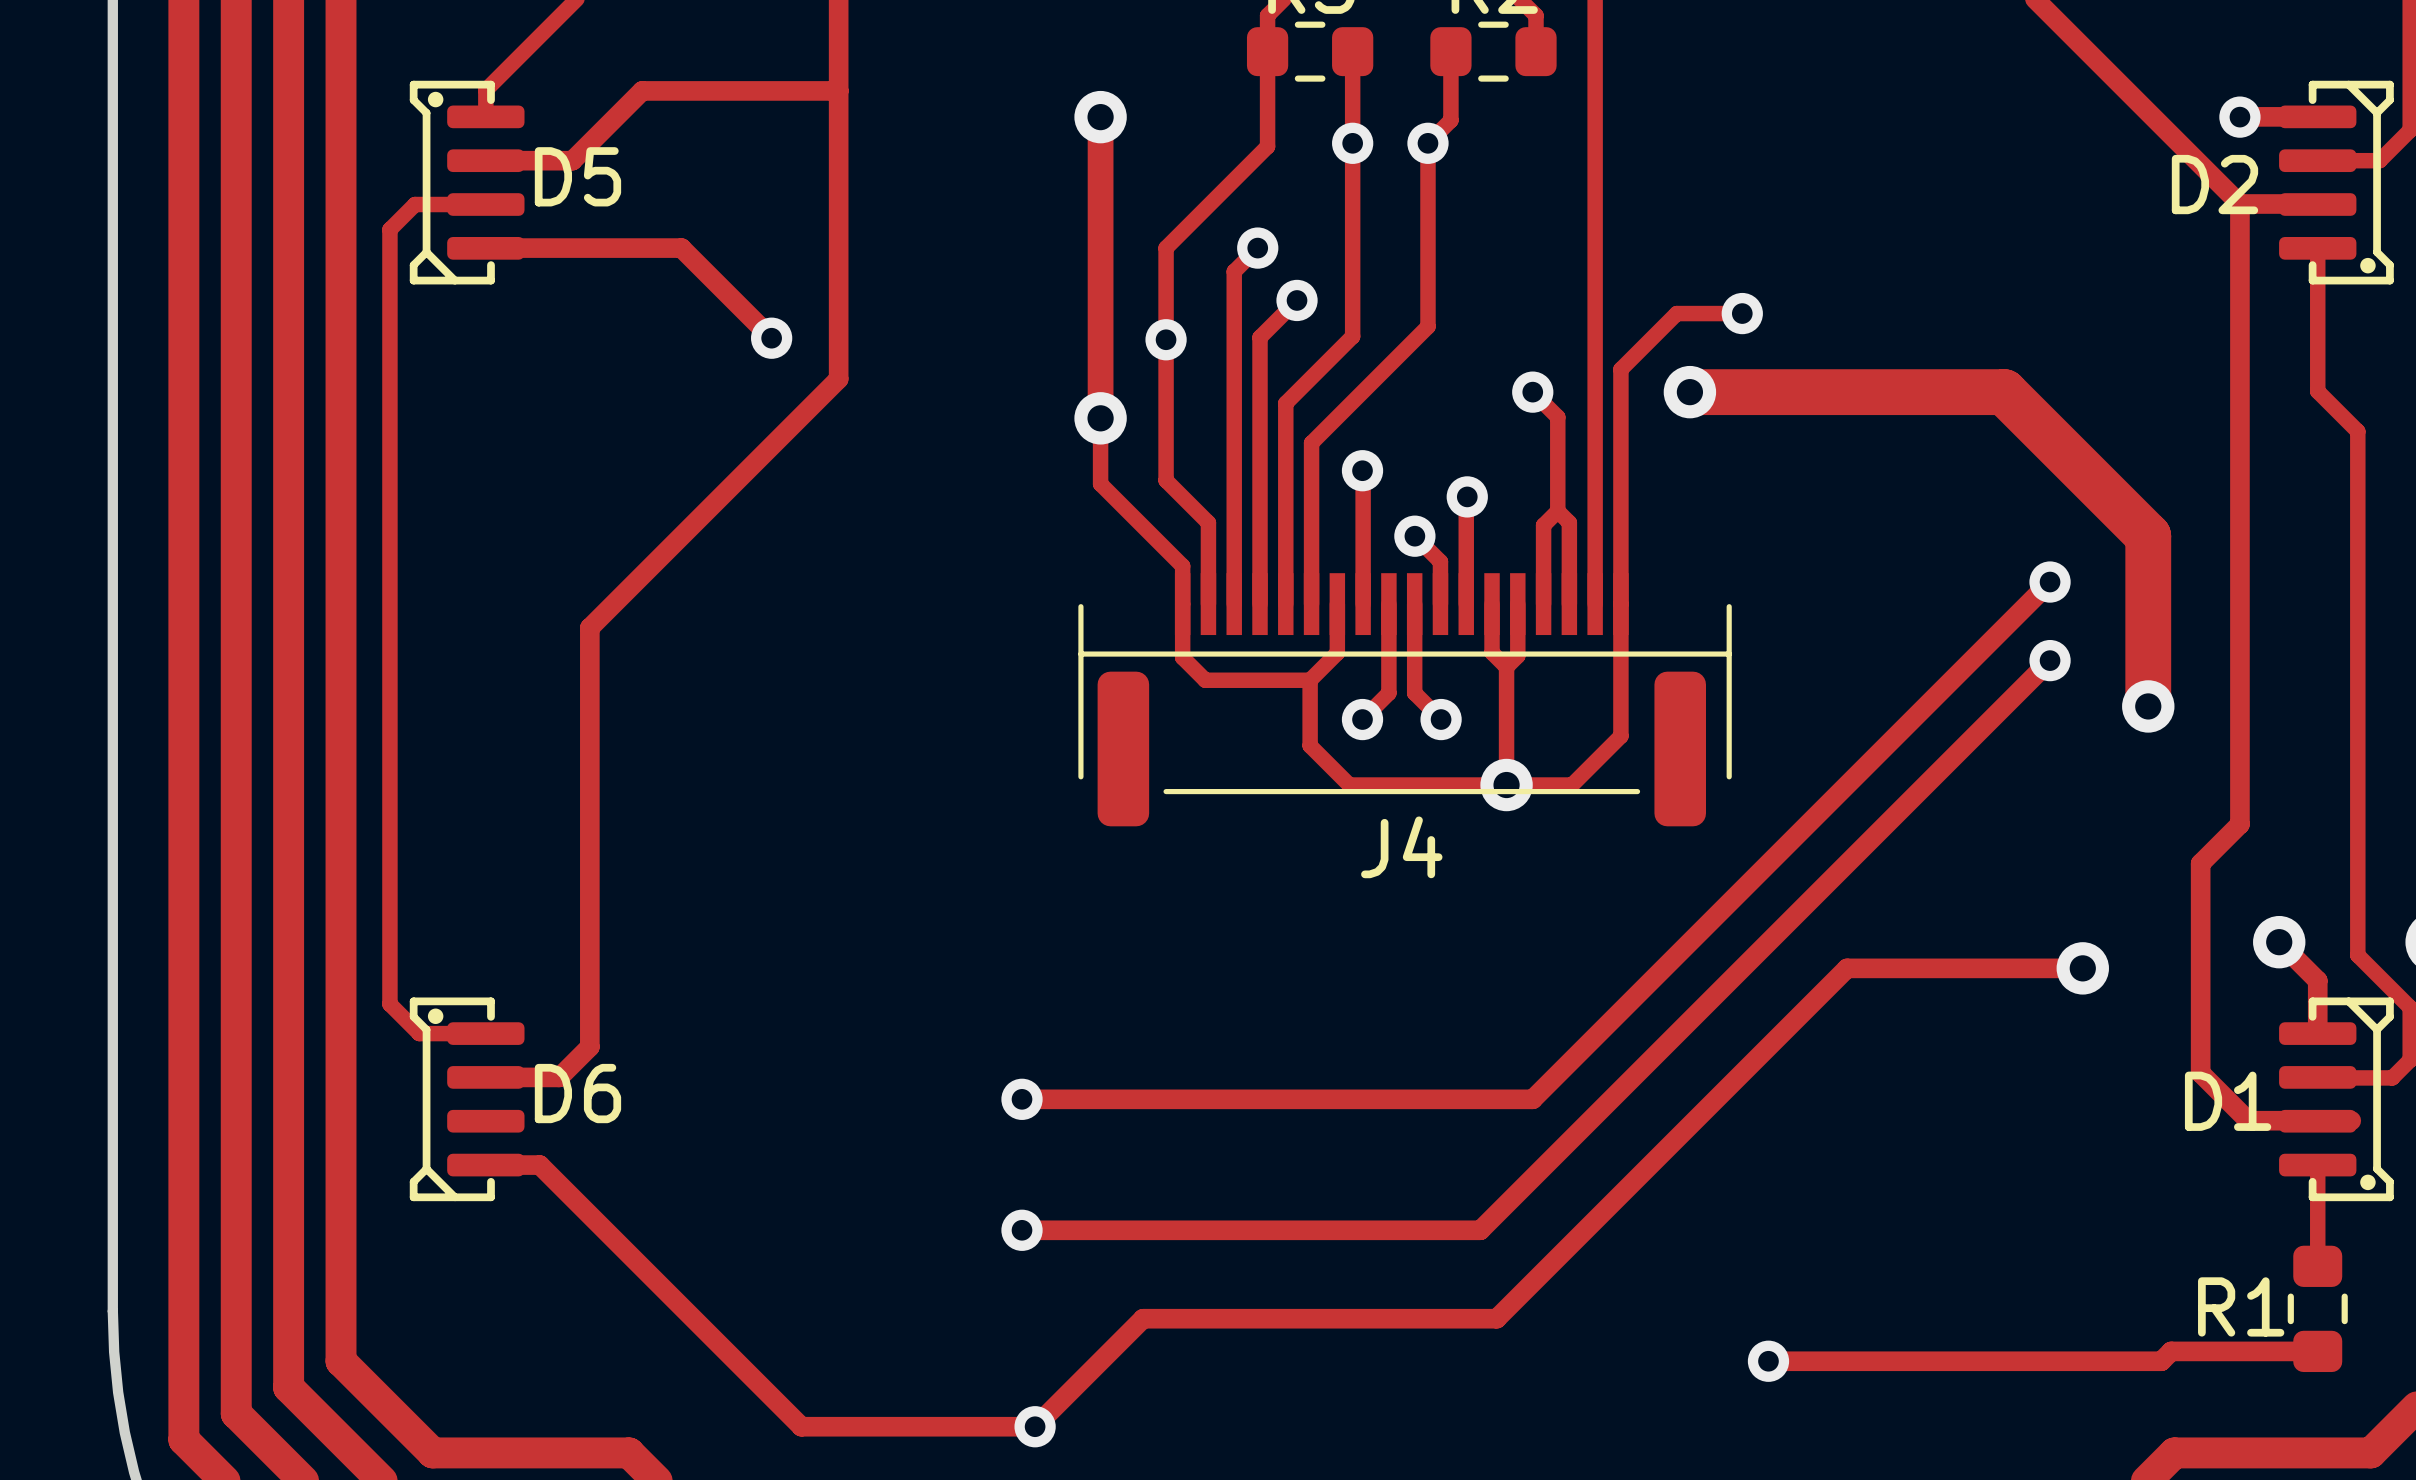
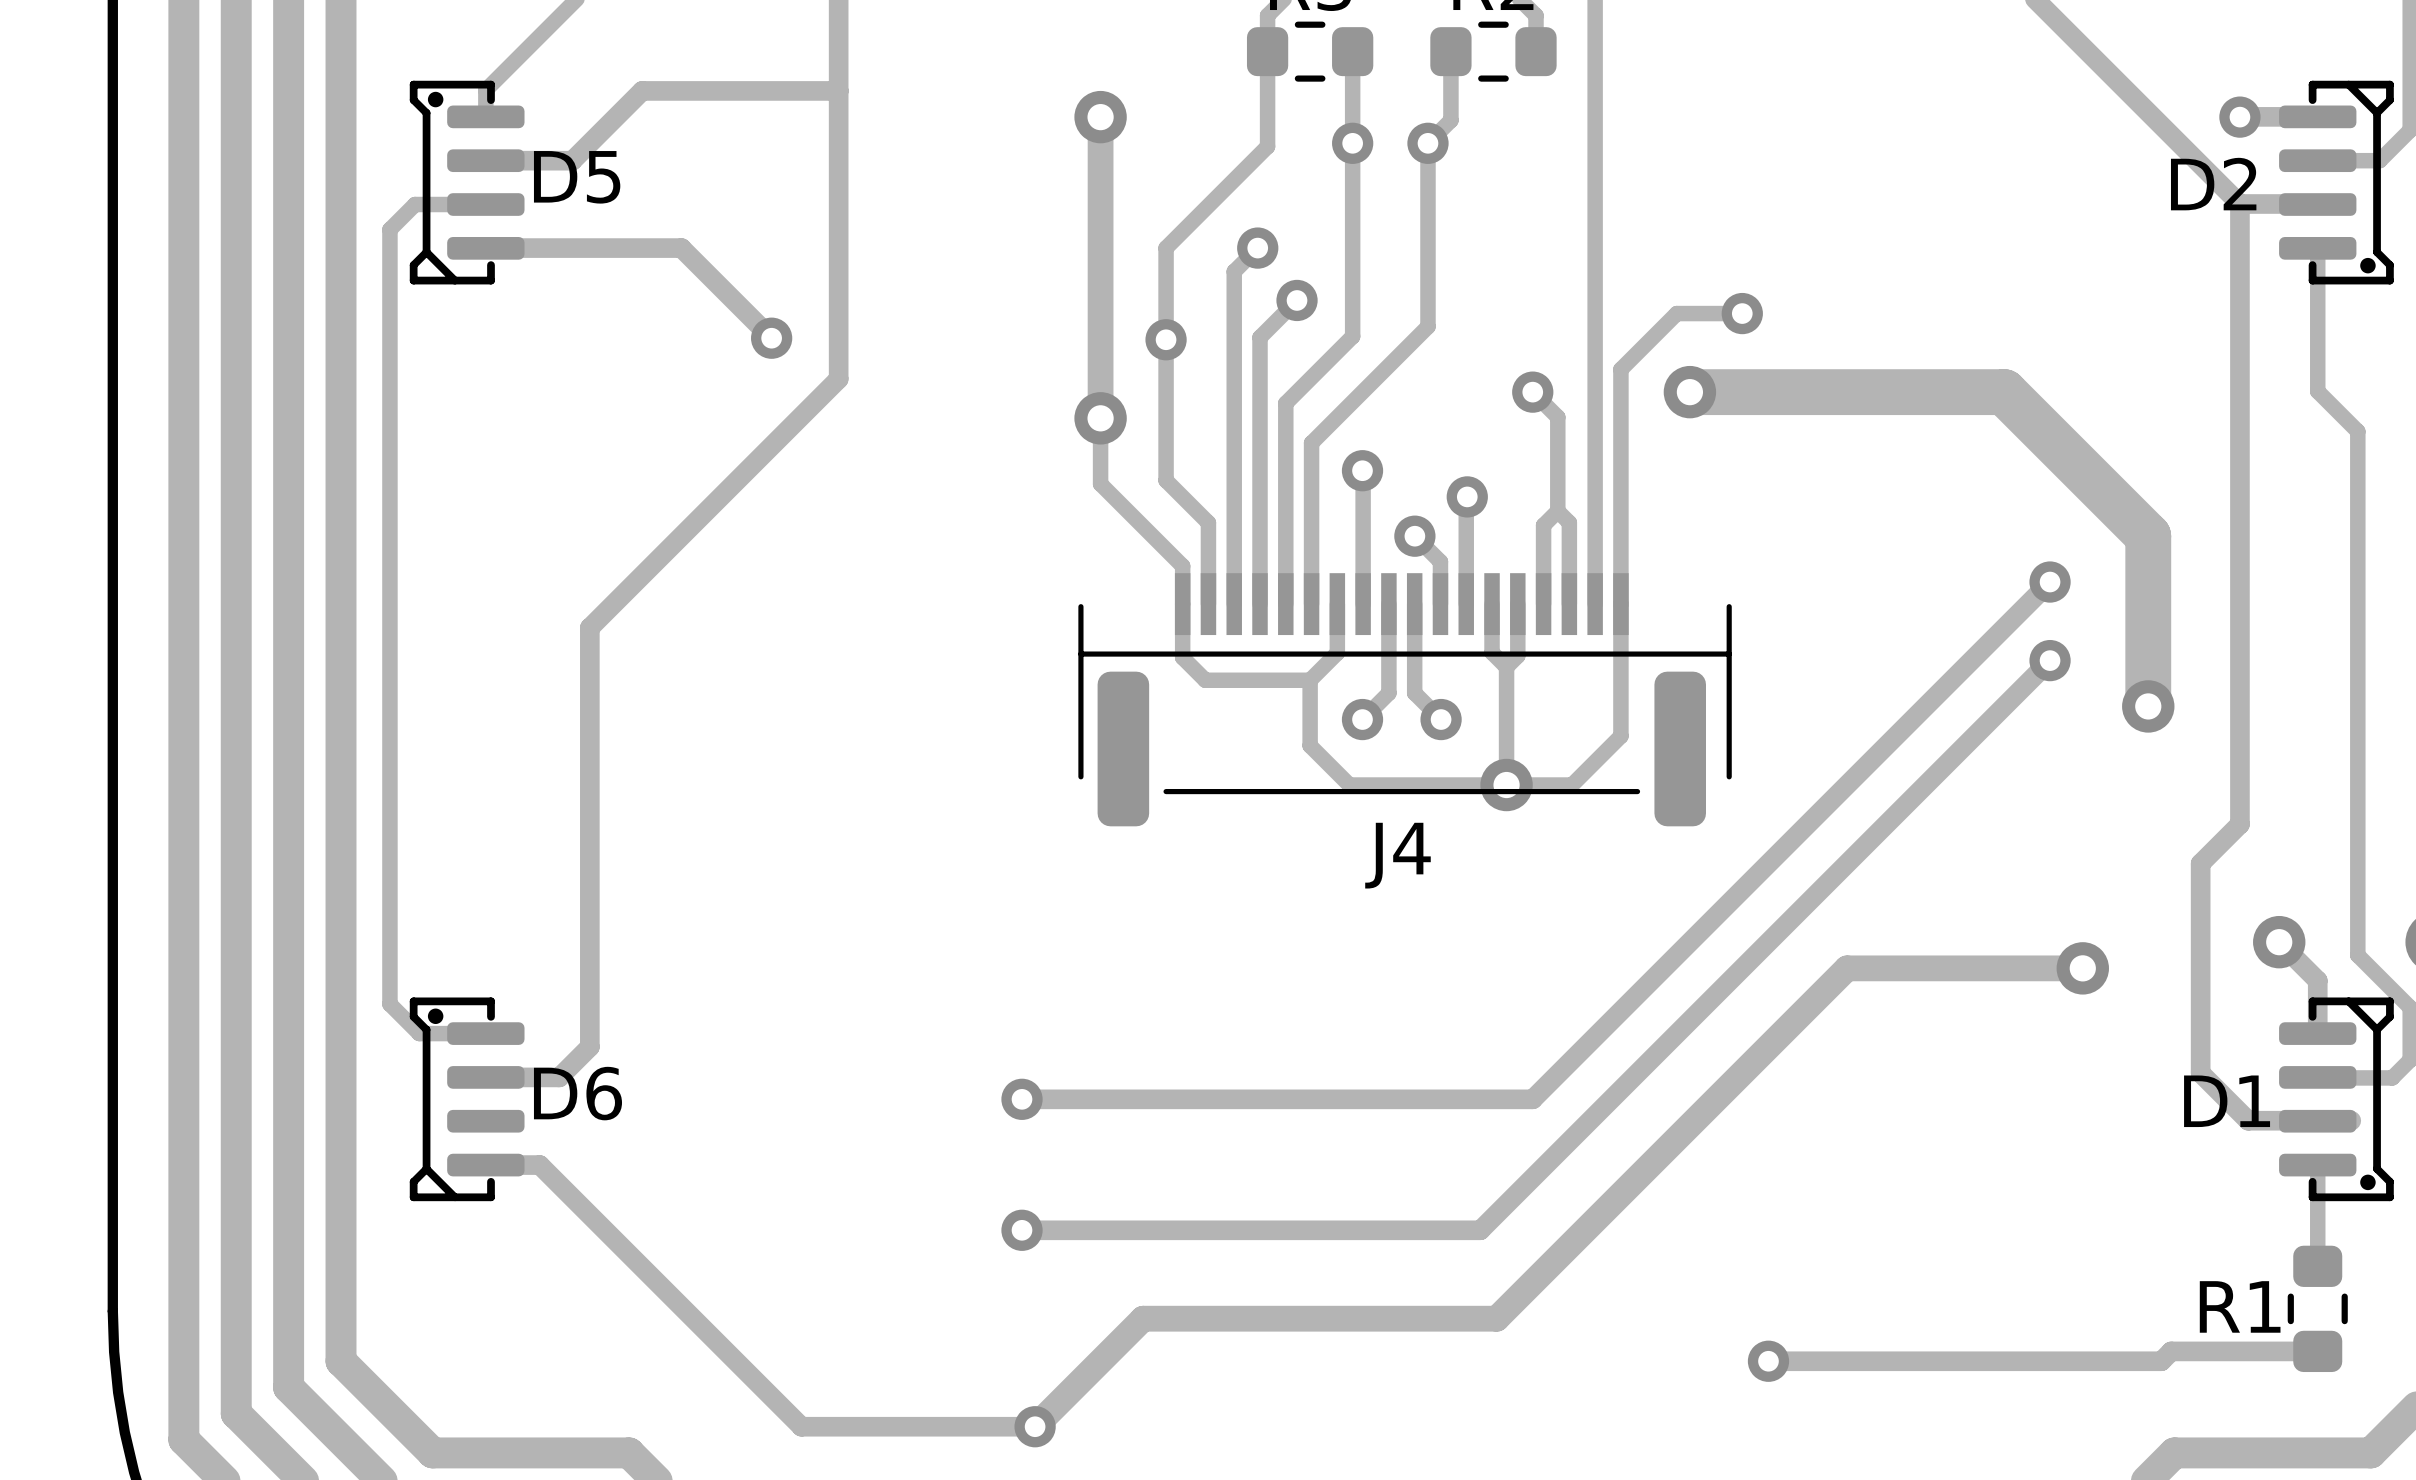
track width: thin (2082, 968) (1847, 968) (1496, 1318) (1143, 1318) (1035, 1426) -> thick (2082, 968) (1847, 968) (1496, 1318) (1143, 1318) (1035, 1426)

